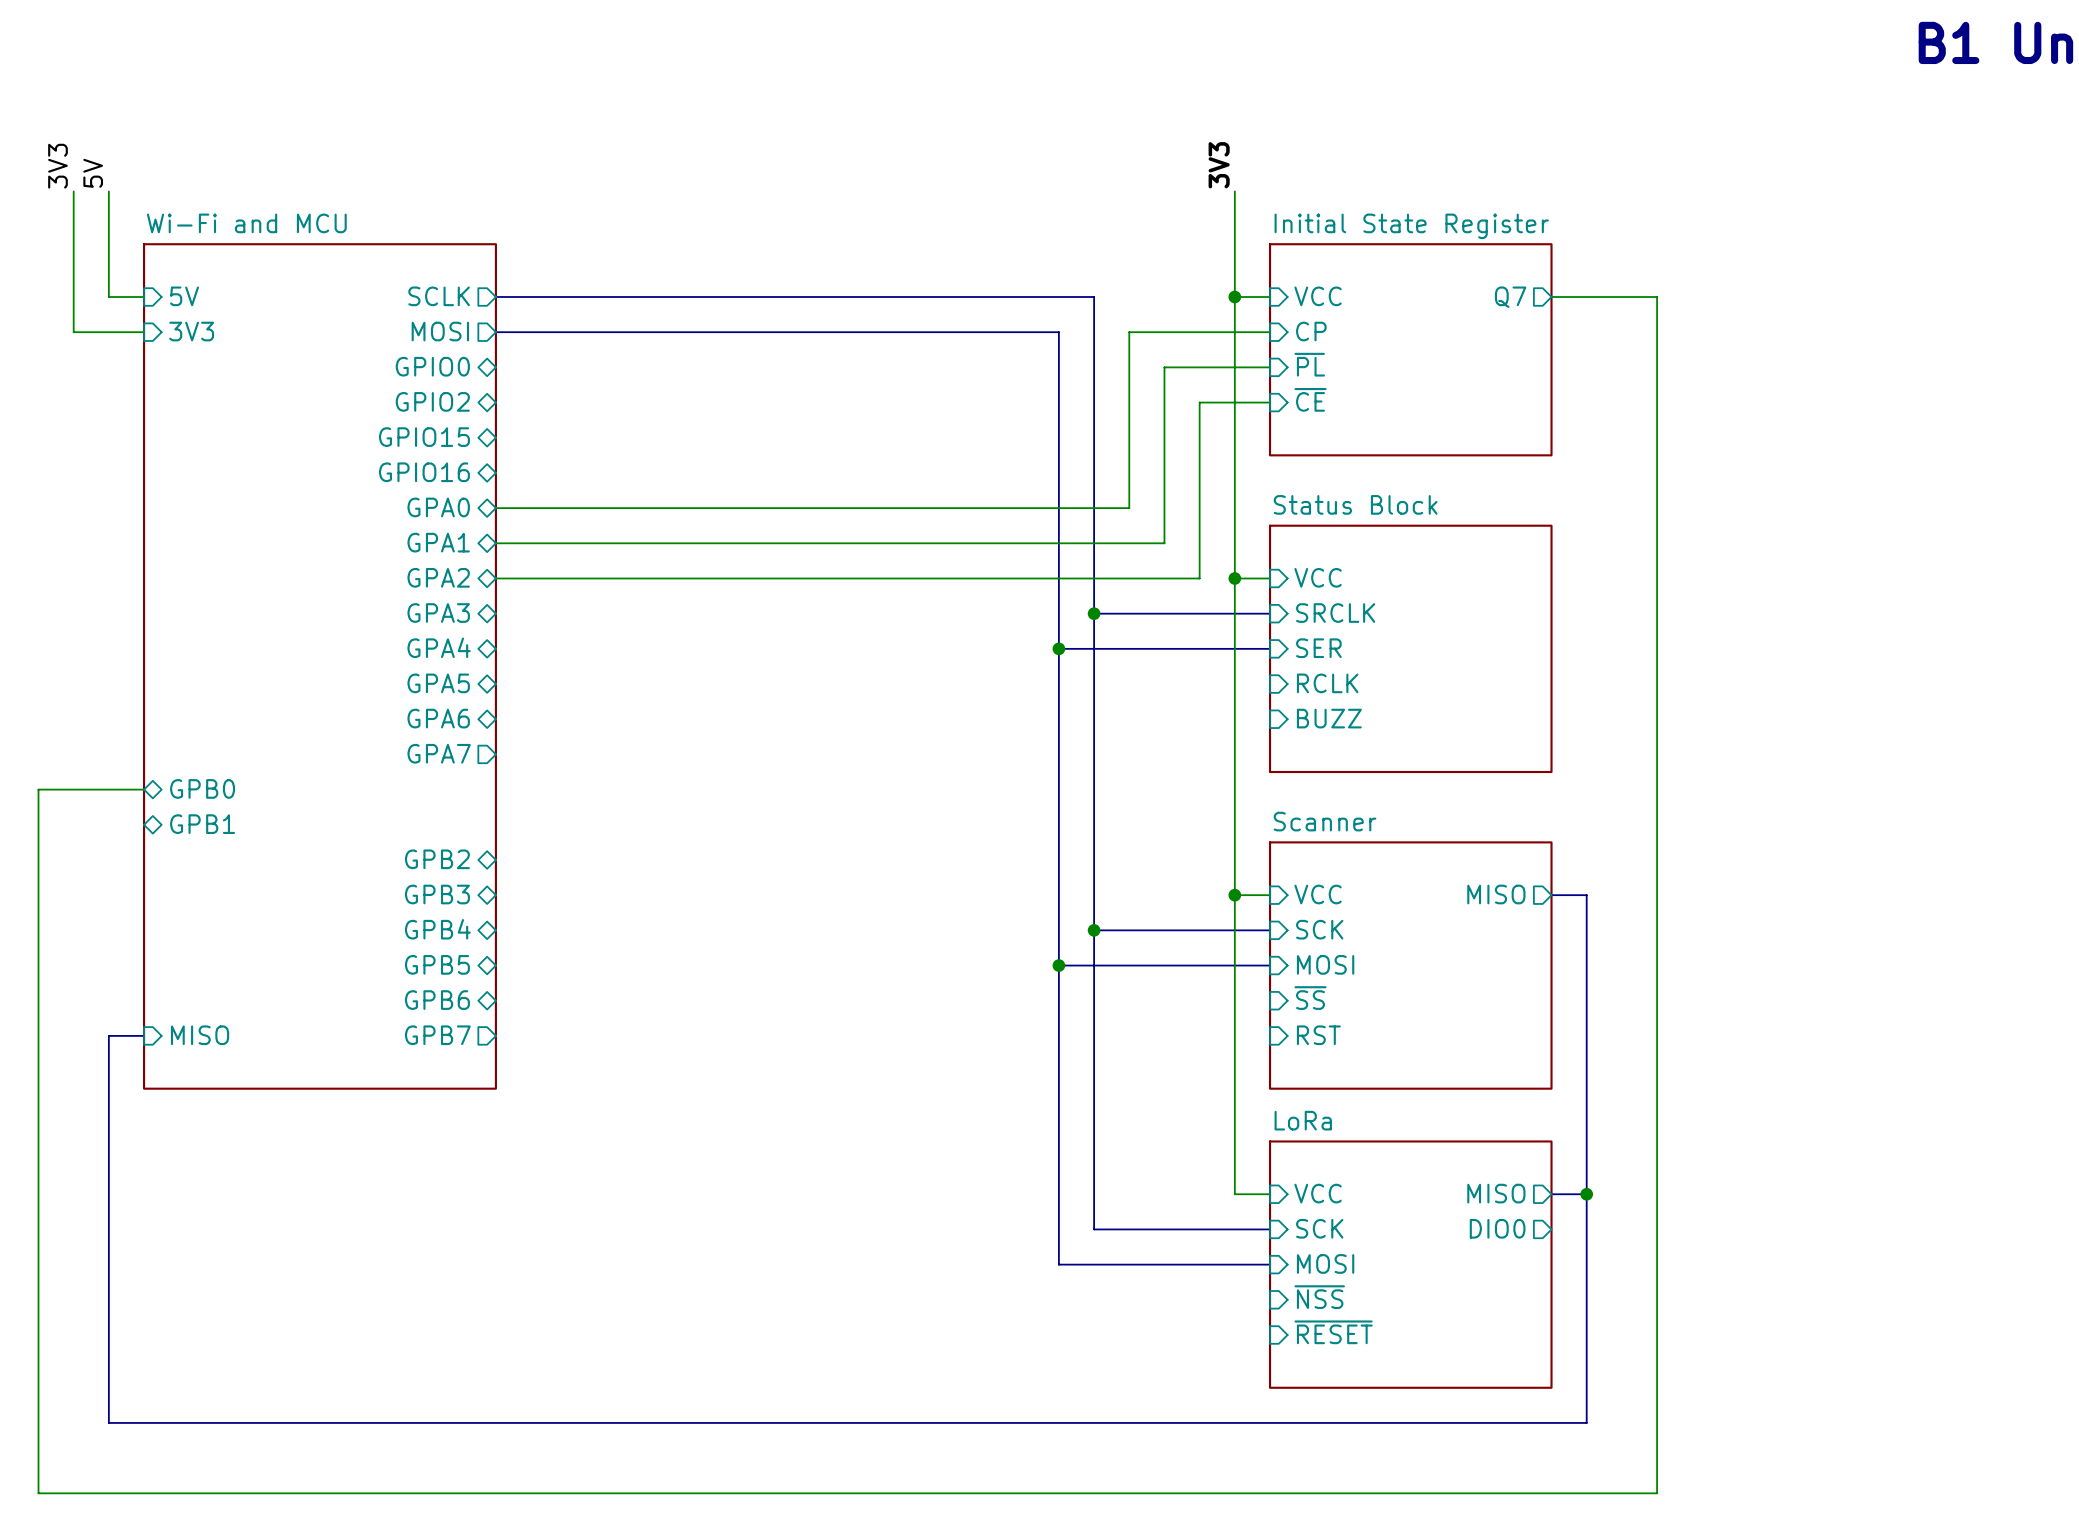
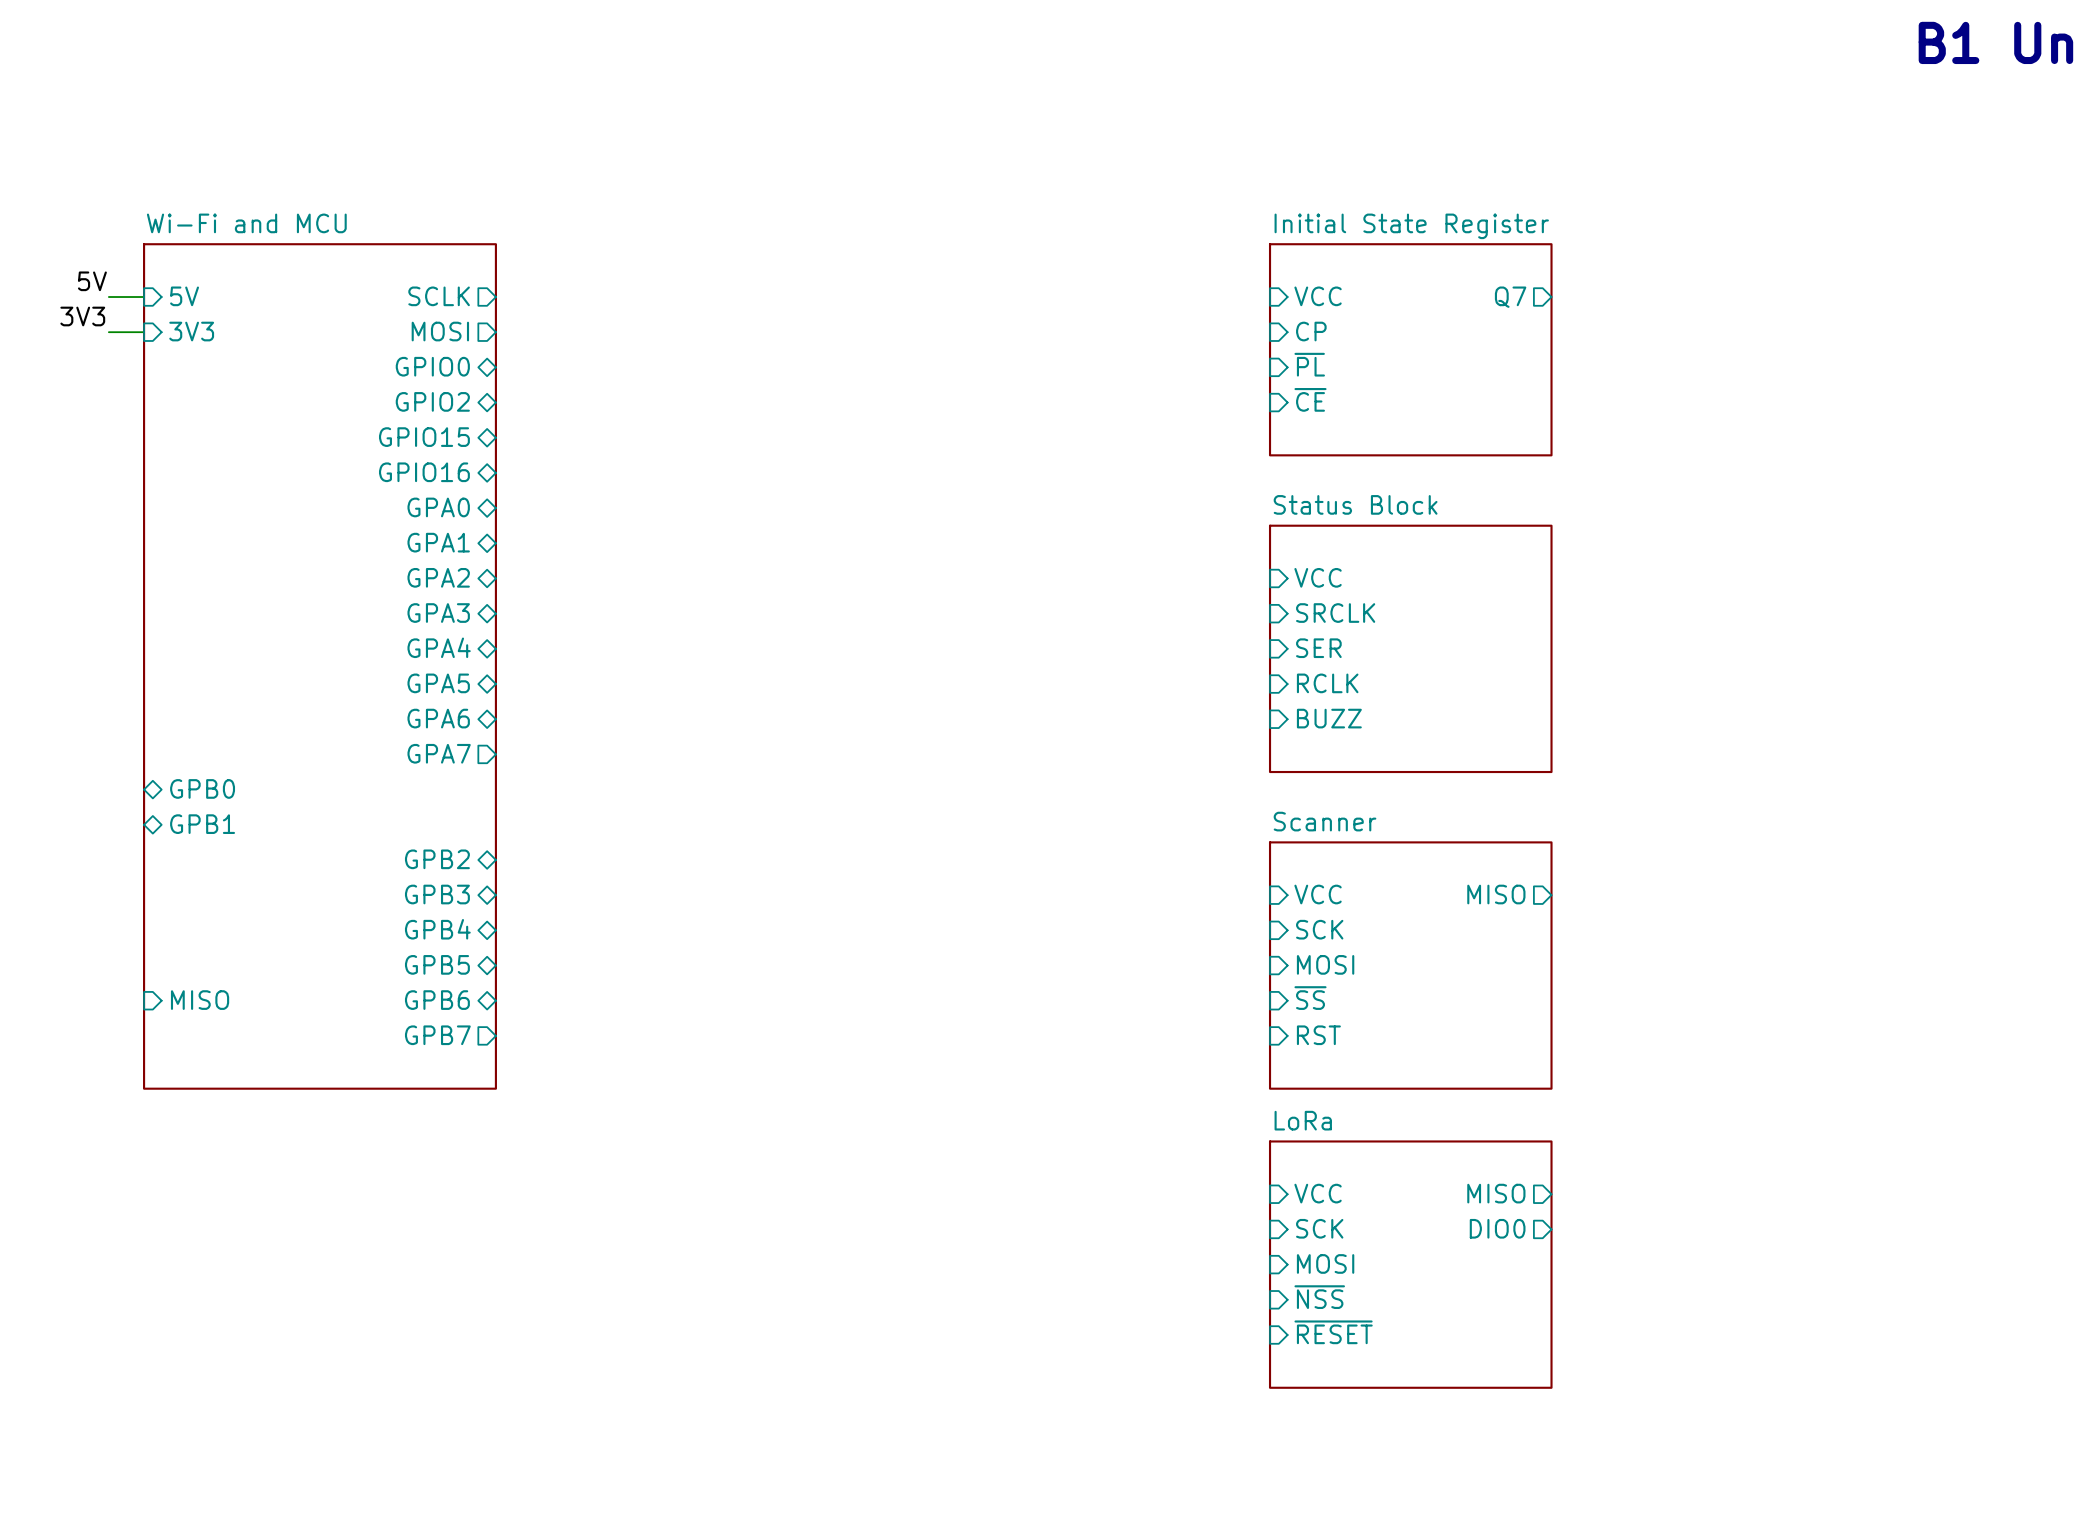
label: 3V3 (1219, 165) -> none
label rotation: 0° (57, 166) -> 90° clockwise (82, 316)
label position: 3V3 (57, 166) -> 3V3 (82, 316)
label rotation: 0° (93, 173) -> 90° clockwise (92, 281)
label position: 5V (93, 173) -> 5V (92, 281)
wire: (73, 191) (73, 332) (108, 332) -> none
wire: (108, 191) (108, 297) -> none
wire: (1234, 191) (1234, 1194) (1270, 1194) -> none
bus: (495, 297) (1094, 297) (1094, 1229) (1270, 1229) -> none
wire: (1234, 297) (1270, 297) -> none
junction: (1234, 297) -> none
wire: (1551, 297) (1657, 297) (1657, 1493) (38, 1493) (38, 789) (144, 789) -> none
bus: (495, 332) (1058, 332) (1058, 1264) (1270, 1264) -> none
wire: (1270, 332) (1129, 332) (1129, 508) (495, 508) -> none
wire: (1270, 367) (1164, 367) (1164, 543) (495, 543) -> none
wire: (1270, 402) (1199, 402) (1199, 578) (495, 578) -> none
wire: (1234, 578) (1270, 578) -> none
junction: (1234, 578) -> none
bus: (1094, 613) (1270, 613) -> none
junction: (1094, 613) -> none
bus: (1058, 648) (1270, 648) -> none
junction: (1058, 648) -> none
wire: (1234, 895) (1270, 895) -> none
junction: (1234, 895) -> none
bus: (1551, 895) (1586, 895) (1586, 1422) (108, 1422) (108, 1035) (144, 1035) -> none
bus: (1094, 930) (1270, 930) -> none
junction: (1094, 930) -> none
bus: (1058, 965) (1270, 965) -> none
junction: (1058, 965) -> none
sheet pin position: MISO (200, 1035) -> MISO (200, 1000)
bus: (1551, 1194) (1586, 1194) -> none
junction: (1586, 1194) -> none

